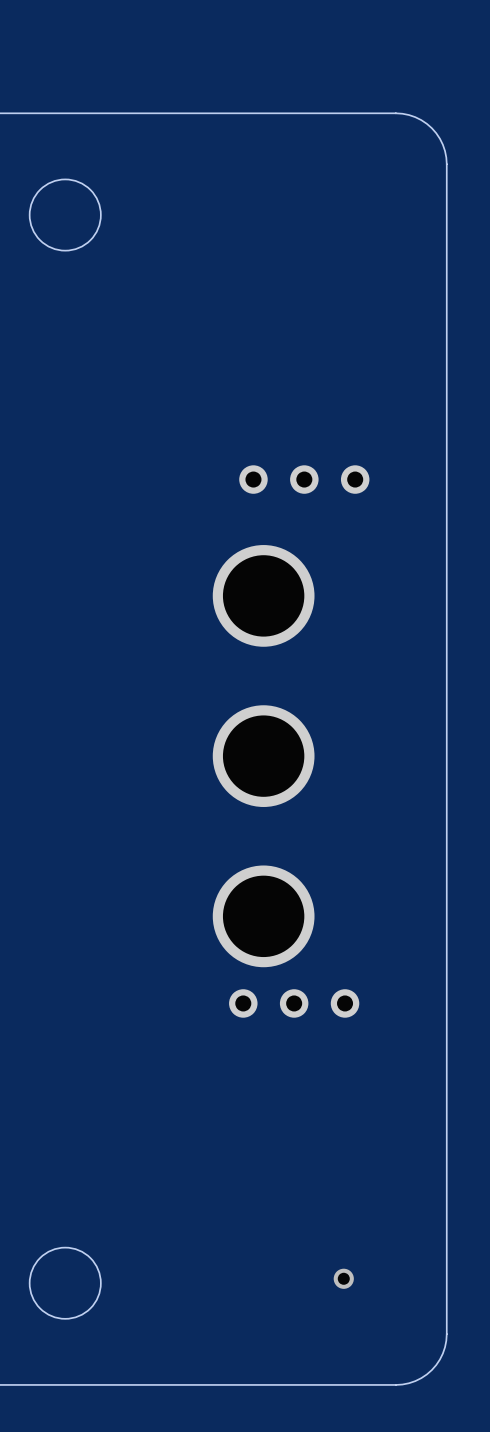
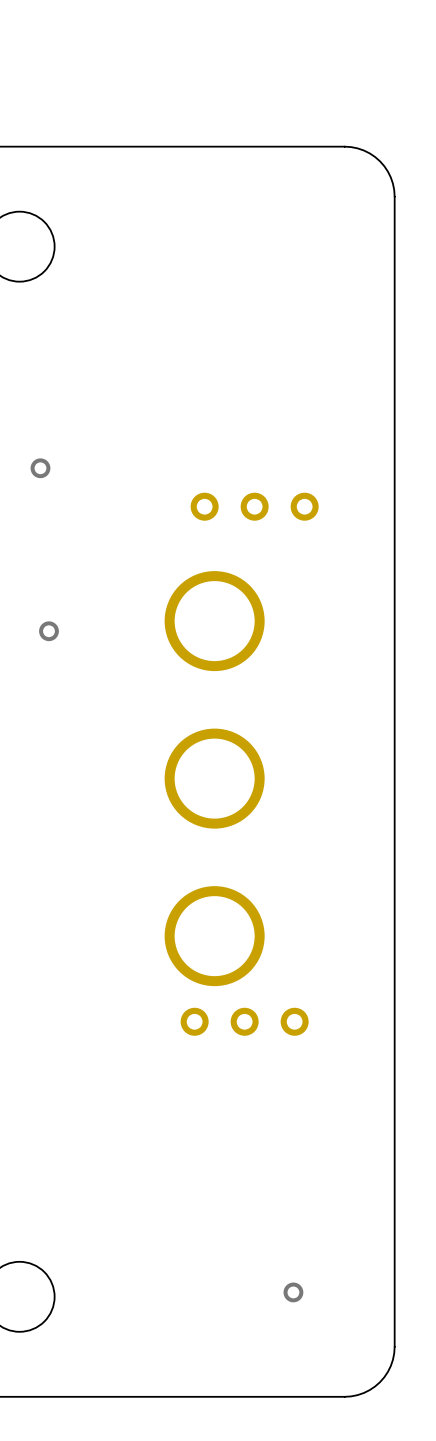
via: none -> (40, 468)
via: none -> (48, 631)

